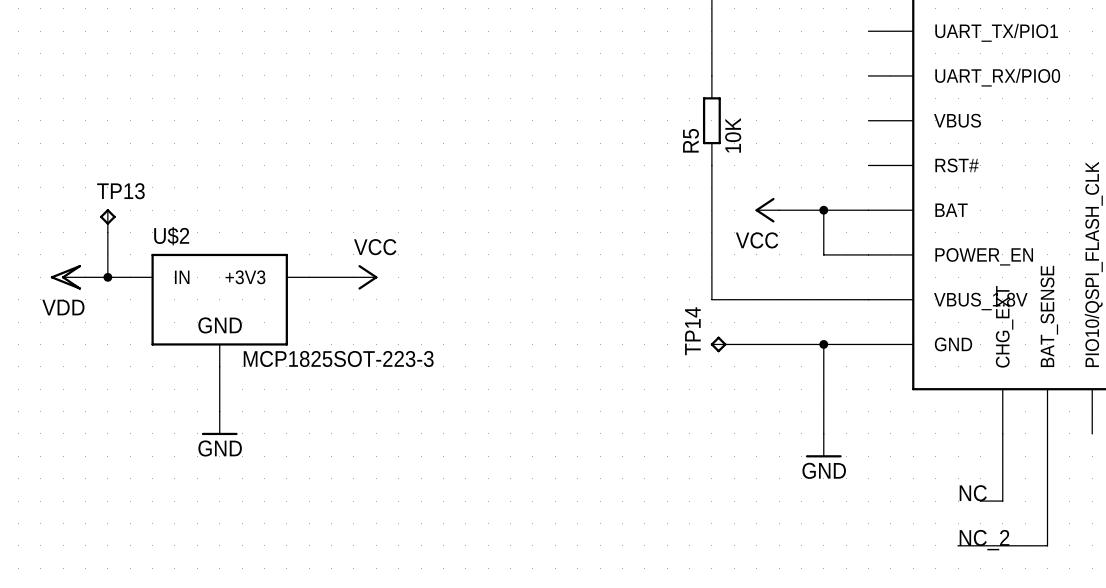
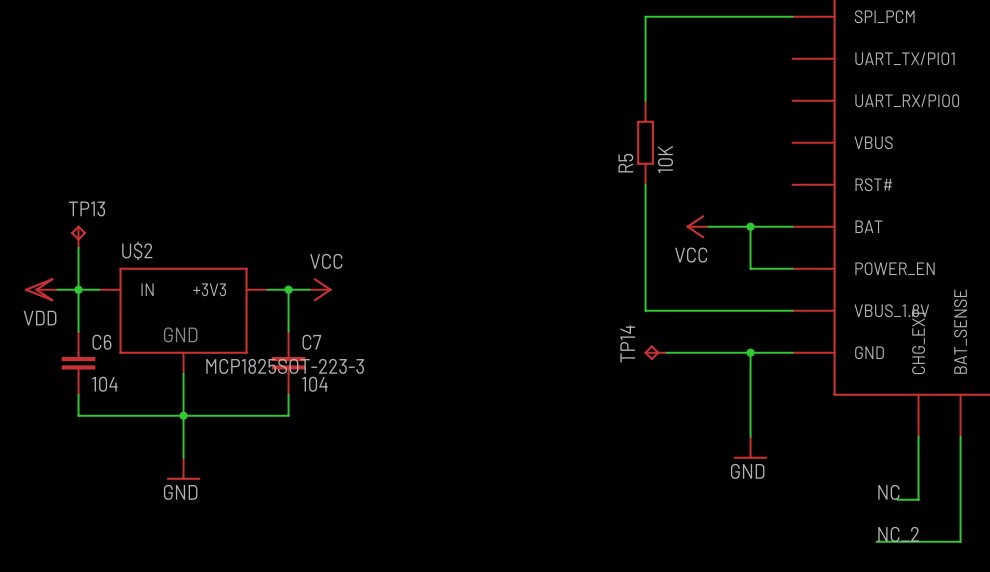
wire: none -> (78, 289) (78, 331)
wire: none -> (288, 289) (288, 331)
junction: none -> (288, 289)
C6: none -> 104 (78, 363)
C7: none -> 104 (288, 363)
wire: none -> (78, 394) (78, 415) (288, 415) (288, 394)
junction: none -> (183, 415)
power symbol position: GND (219, 423) -> GND (183, 468)

